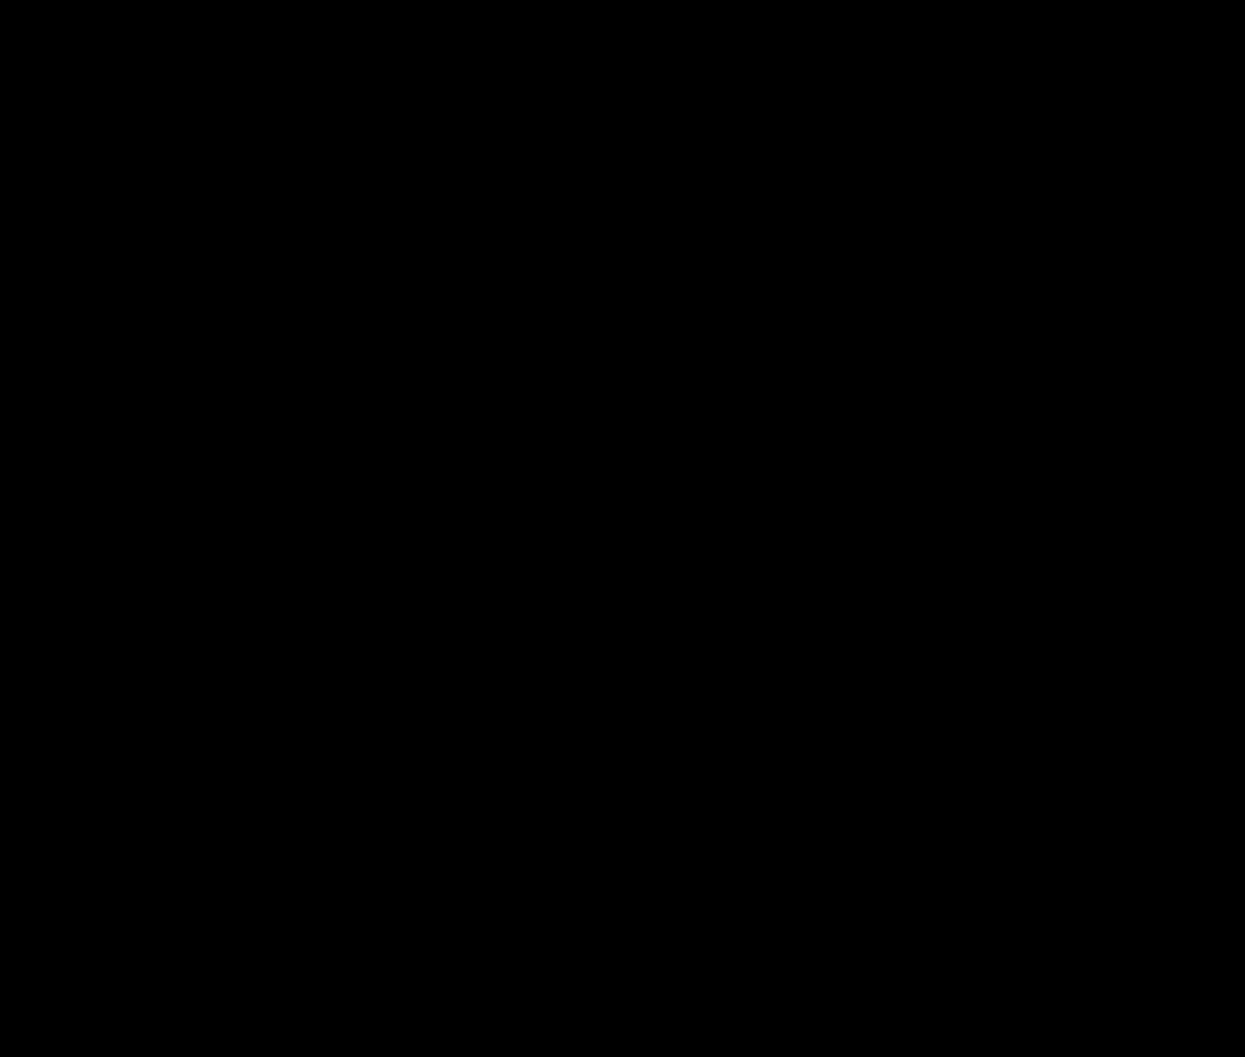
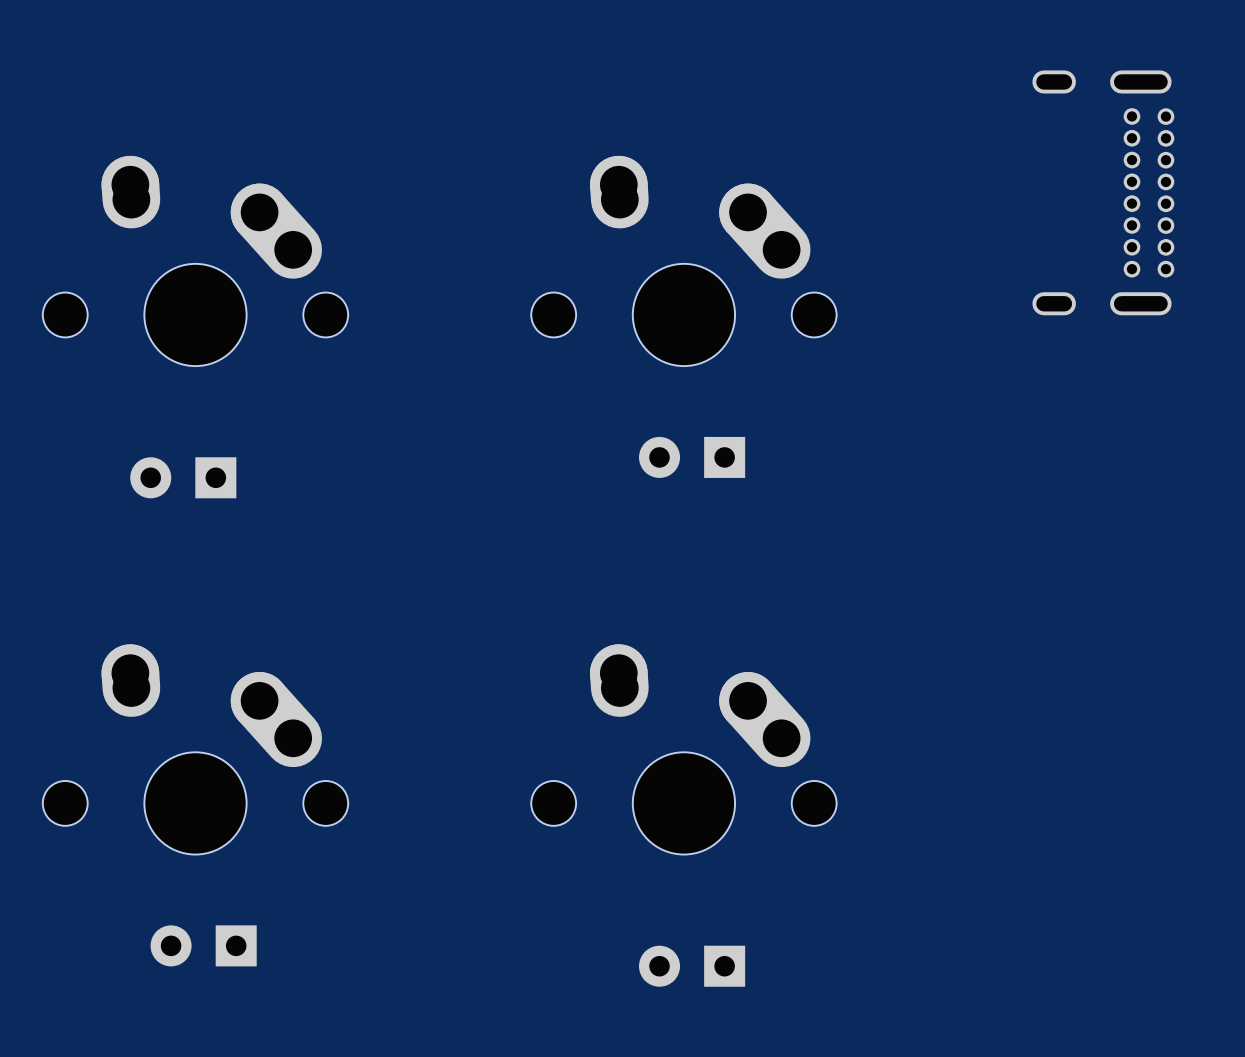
part: none -> (1103, 192)
part: none -> (195, 260)
part: none -> (683, 260)
part: none -> (692, 457)
part: none -> (183, 477)
part: none -> (195, 749)
part: none -> (683, 749)
part: none -> (203, 945)
part: none -> (692, 966)

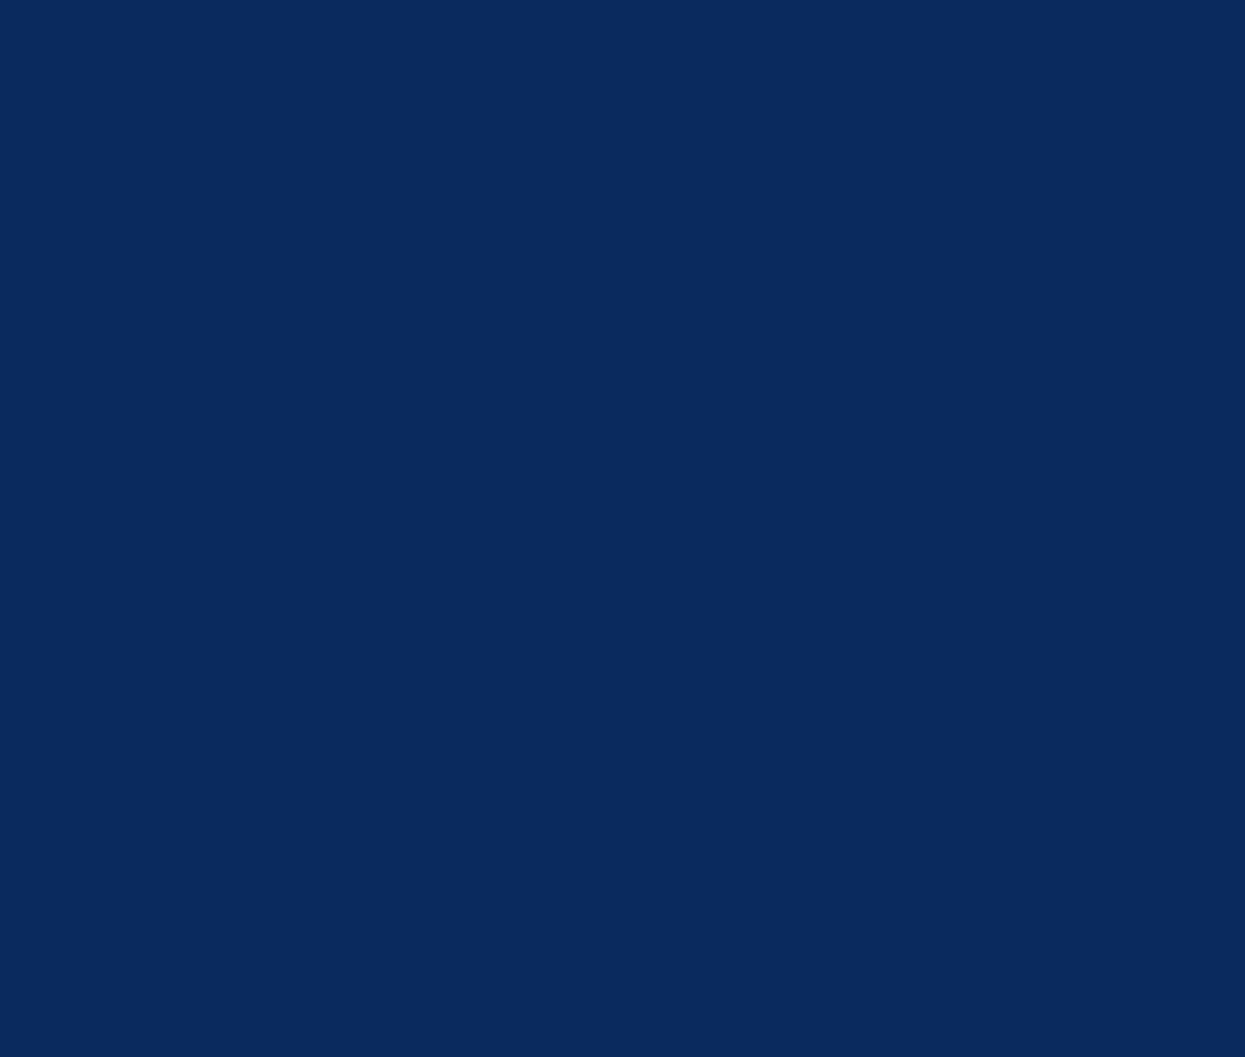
part: (1103, 192) -> none
part: (195, 260) -> none
part: (683, 260) -> none
part: (692, 457) -> none
part: (183, 477) -> none
part: (195, 749) -> none
part: (683, 749) -> none
part: (203, 945) -> none
part: (692, 966) -> none

